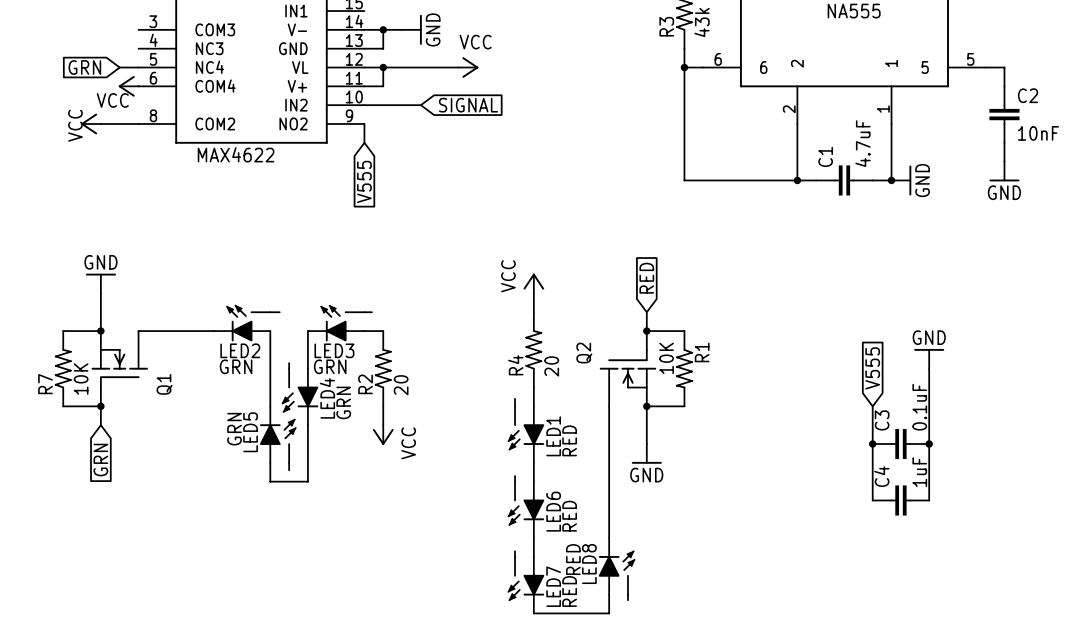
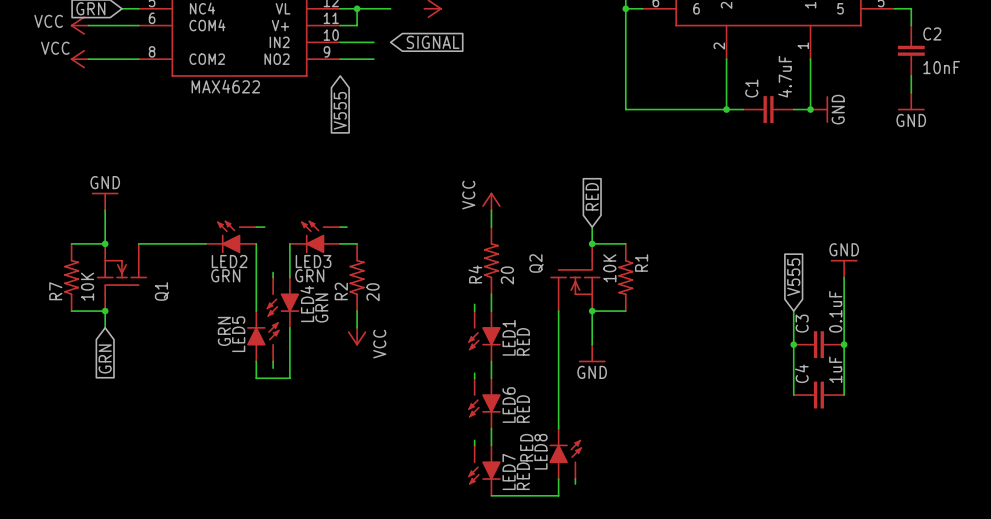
wire: (420, 67) (458, 67) -> none
power symbol: none -> VCC (79, 25)
wire: none -> (88, 25) (138, 25)
power symbol: VCC (128, 86) -> none
wire: (402, 105) (420, 105) -> none
power symbol position: VCC (91, 123) -> VCC (79, 59)
wire: (364, 123) (364, 142) -> (340, 59) (373, 59)
power symbol text rotation: 0° (75, 125) -> 90° clockwise (55, 48)

